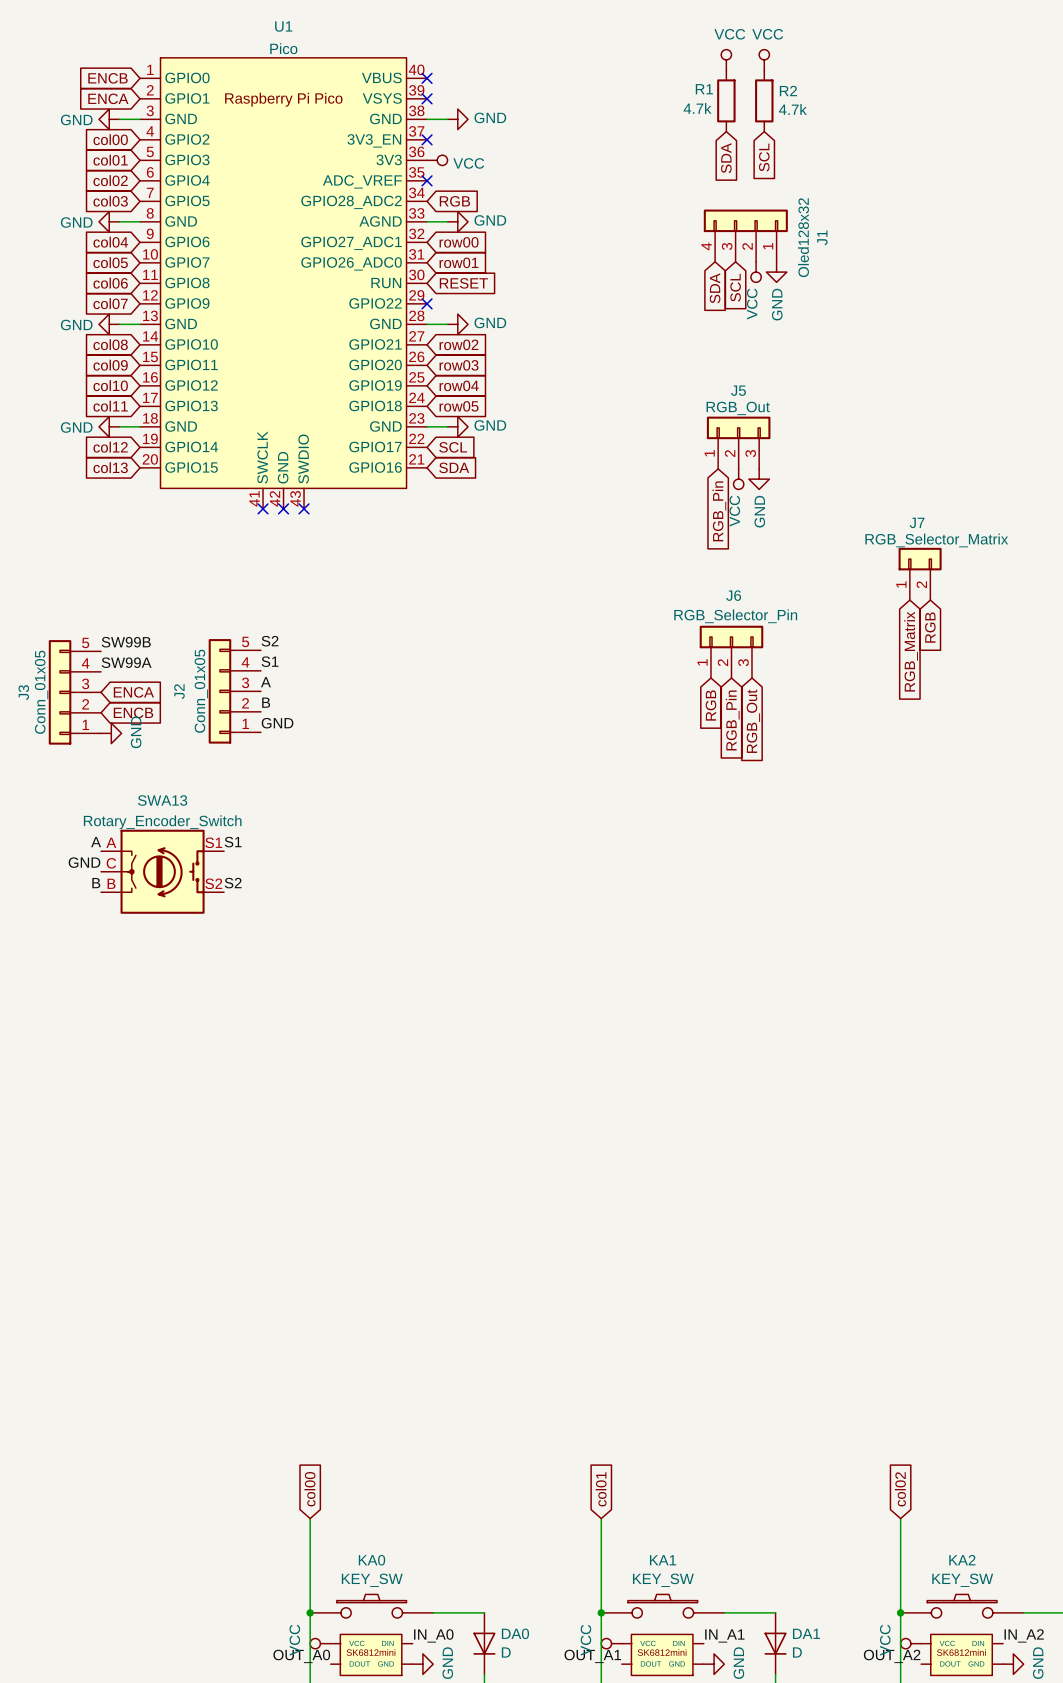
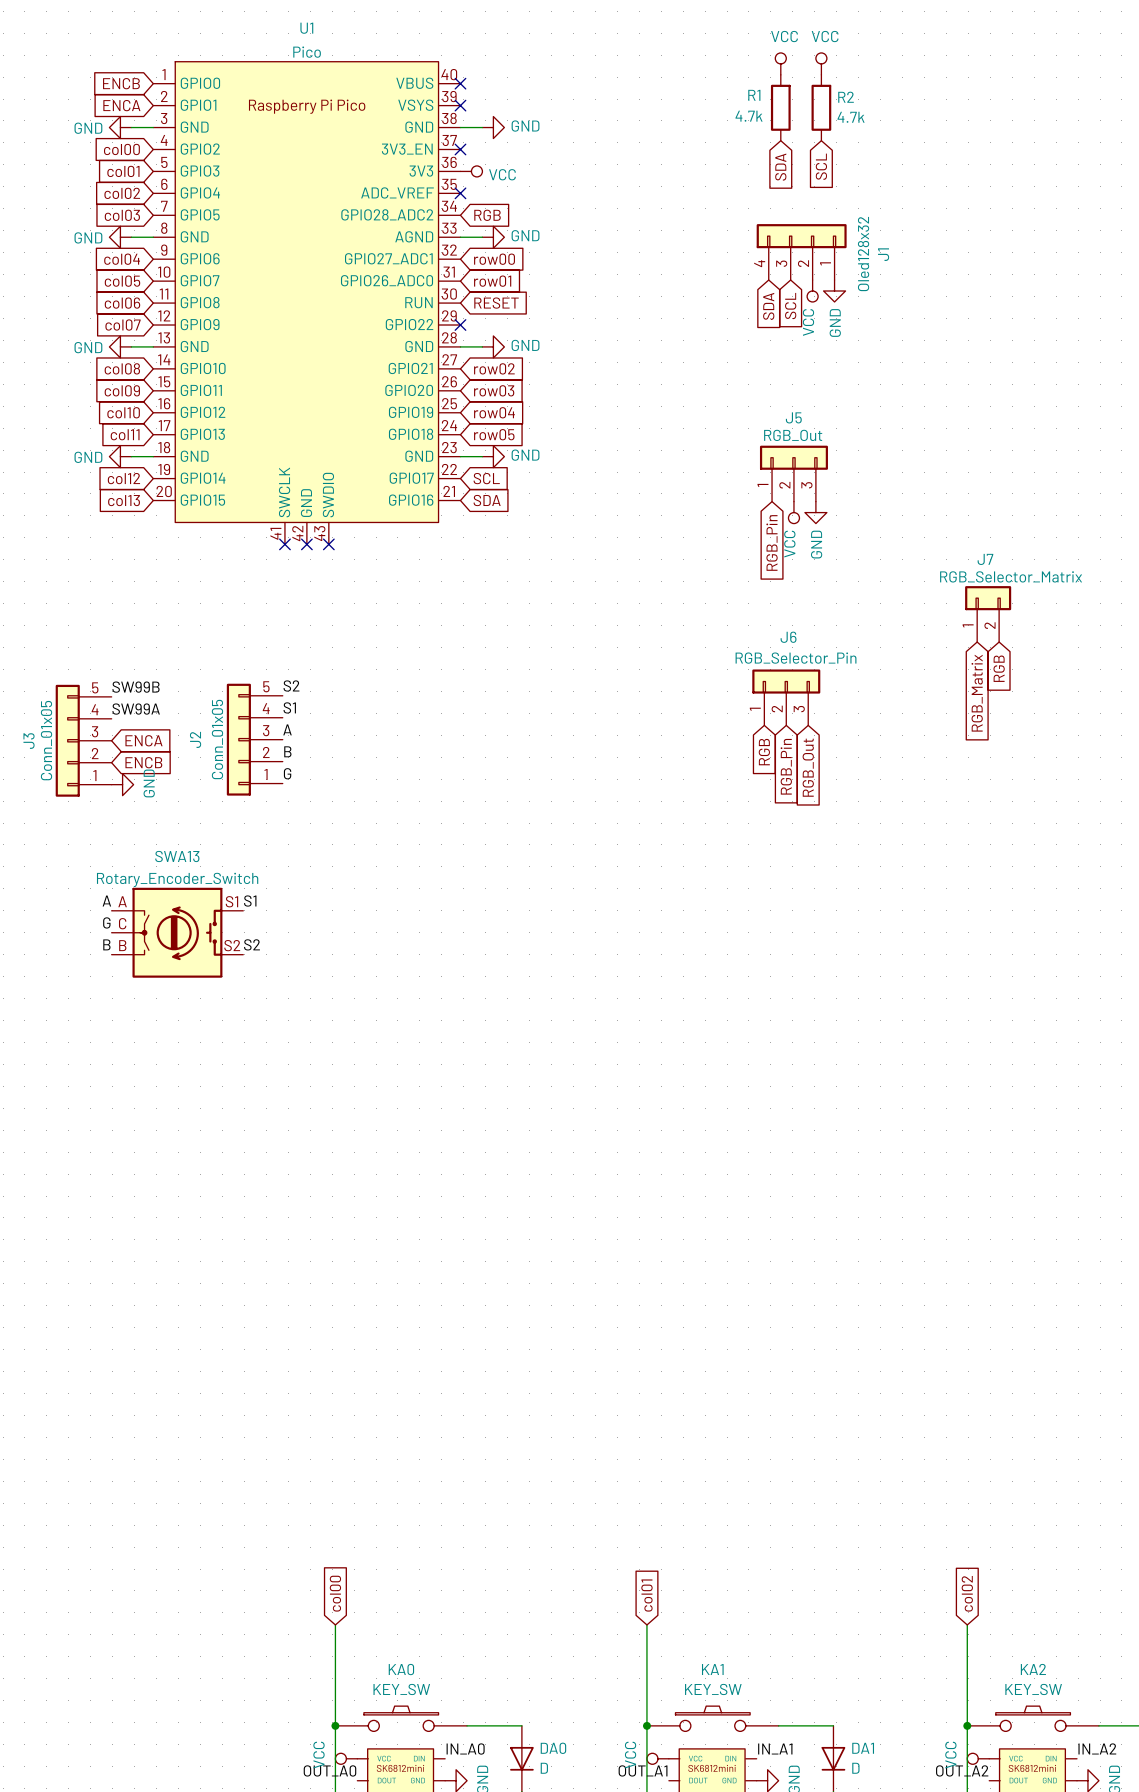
label: GND (277, 723) -> G (287, 773)
label: GND (84, 862) -> G (106, 922)

